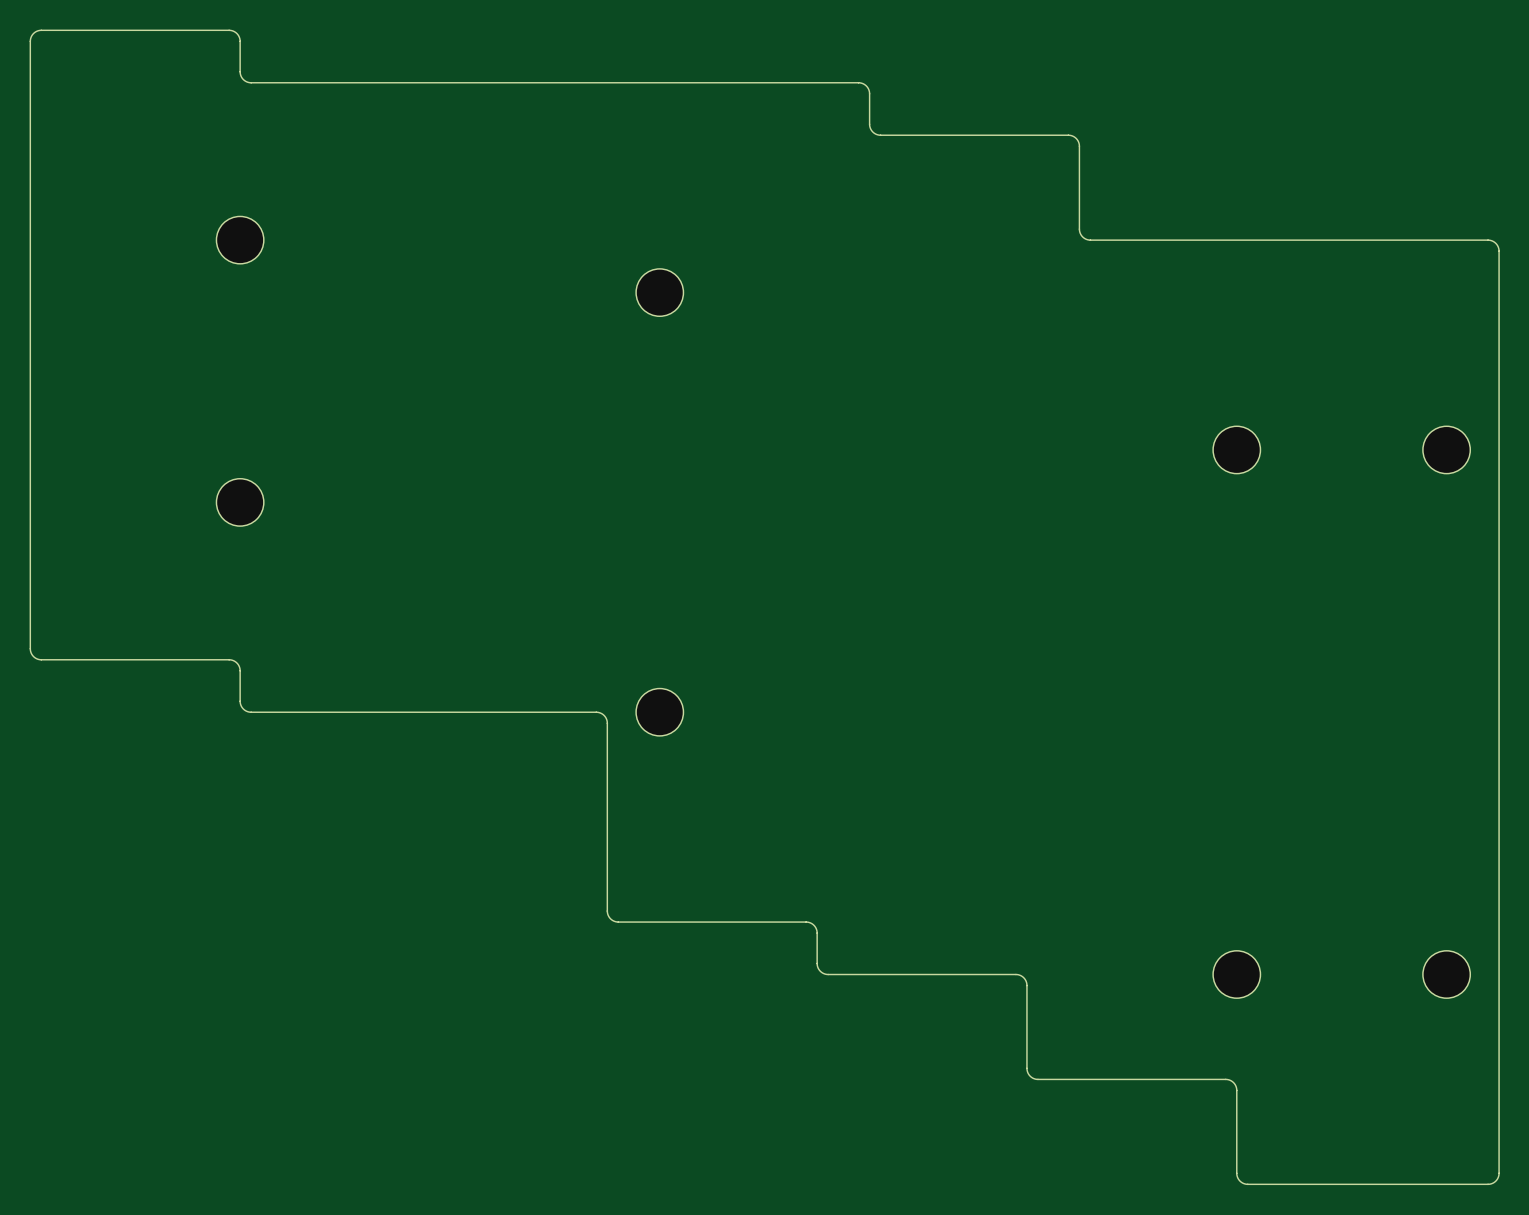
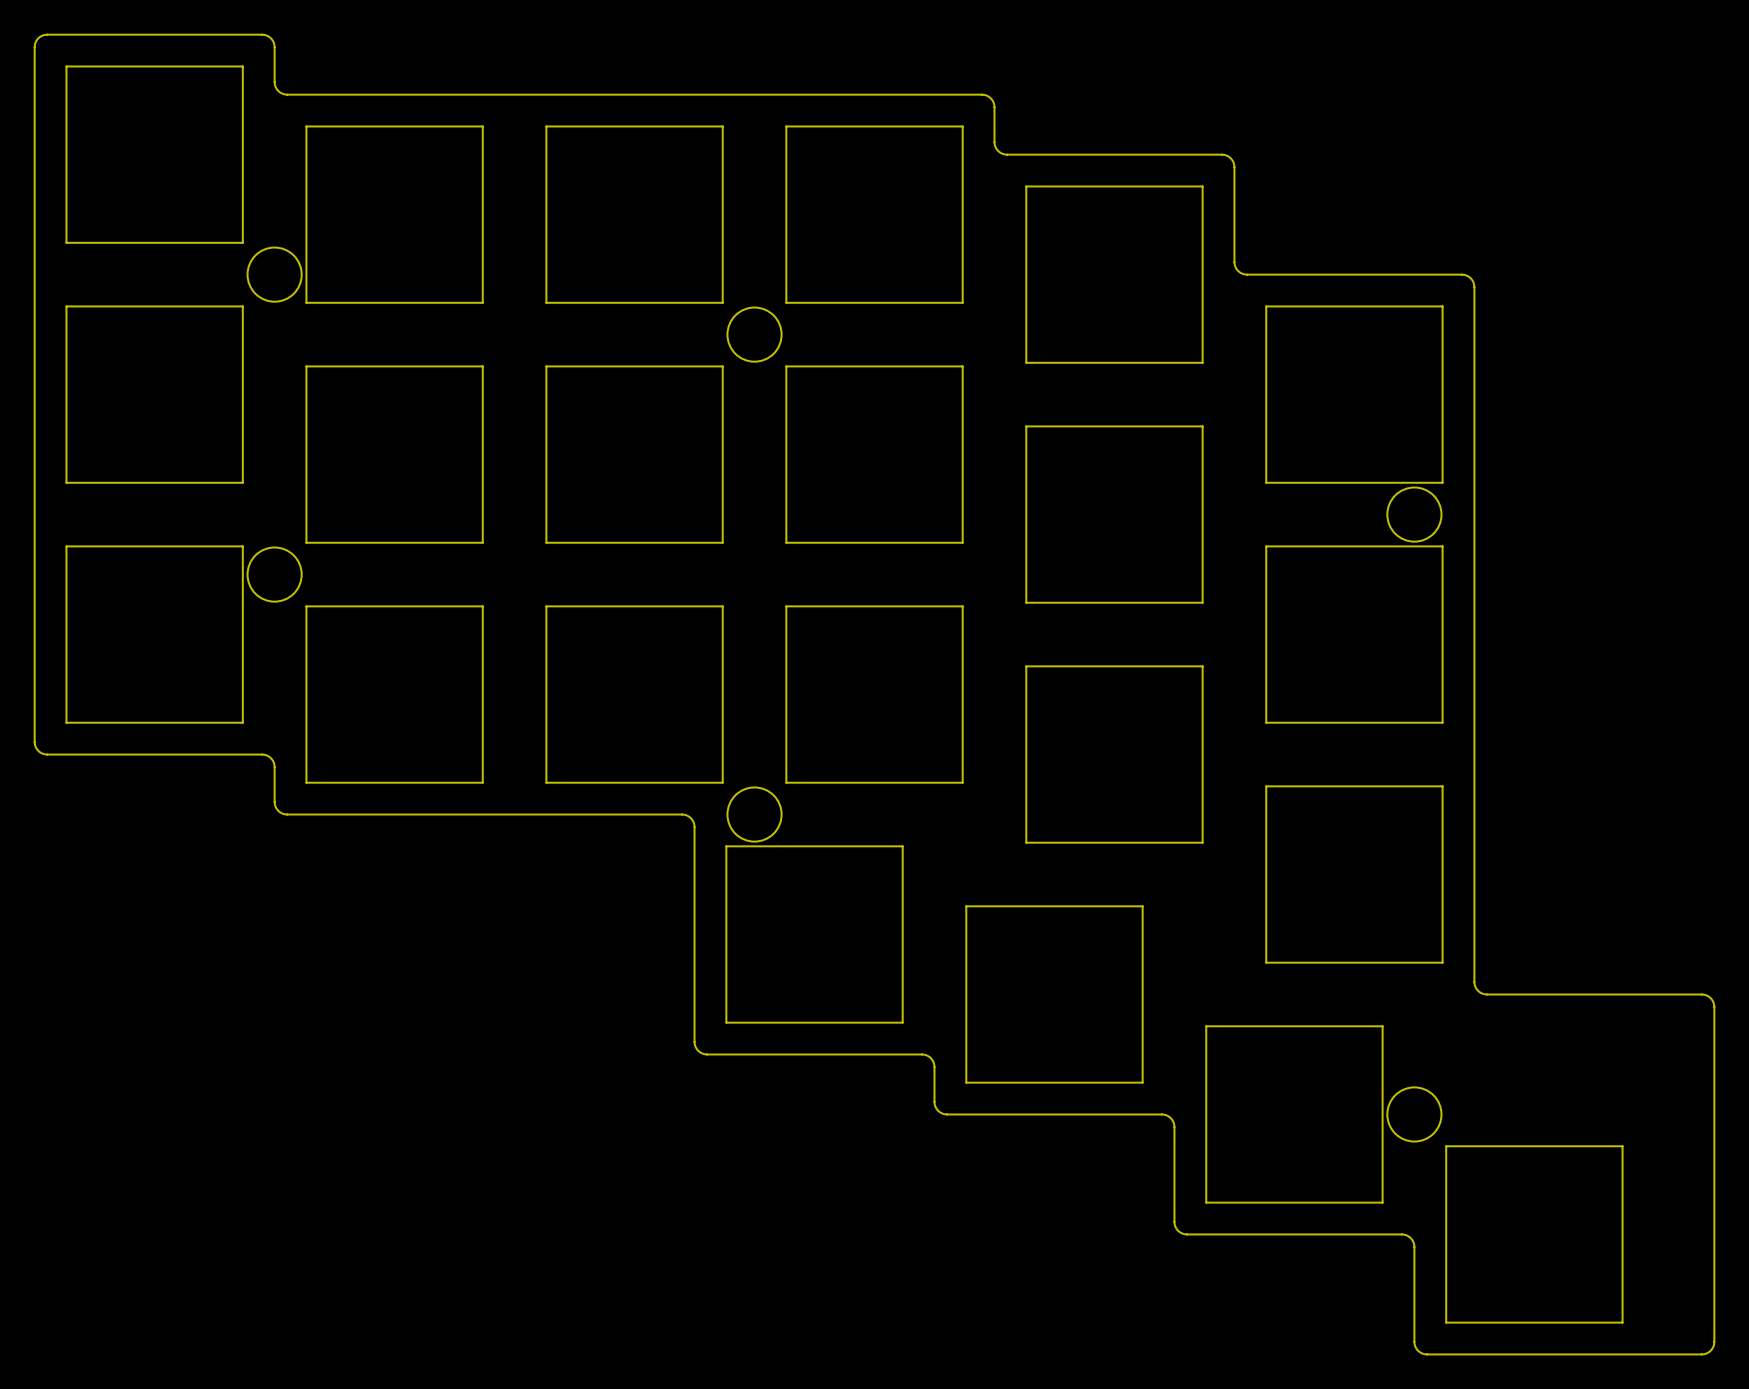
drawing: none -> [65, 65, 244, 244]
drawing: none -> [305, 125, 484, 304]
drawing: none -> [545, 125, 724, 304]
drawing: none -> [785, 125, 964, 304]
drawing: none -> [1025, 185, 1204, 364]
board edge: (1278, 240) (1488, 240) (1493, 241) (1498, 246) (1499, 880) -> (1461, 274) (1470, 278) (1474, 287) (1475, 986) (1479, 991) (1486, 994) (1703, 994) (1710, 998) (1714, 1007)
drawing: none -> [65, 305, 244, 484]
drawing: none -> [1265, 305, 1444, 484]
drawing: none -> [305, 365, 484, 544]
drawing: none -> [545, 365, 724, 544]
drawing: none -> [785, 365, 964, 544]
drawing: none -> [1025, 425, 1204, 604]
part: (1446, 449) -> none
drawing: none -> [65, 545, 244, 724]
drawing: none -> [1265, 545, 1444, 724]
drawing: none -> [305, 605, 484, 784]
drawing: none -> [545, 605, 724, 784]
drawing: none -> [785, 605, 964, 784]
drawing: none -> [1025, 665, 1204, 844]
drawing: none -> [1265, 785, 1444, 964]
drawing: none -> [725, 845, 904, 1024]
drawing: none -> [965, 905, 1144, 1084]
drawing: none -> [1205, 1025, 1384, 1204]
part: (1446, 974) -> none
drawing: none -> [1445, 1145, 1624, 1324]

